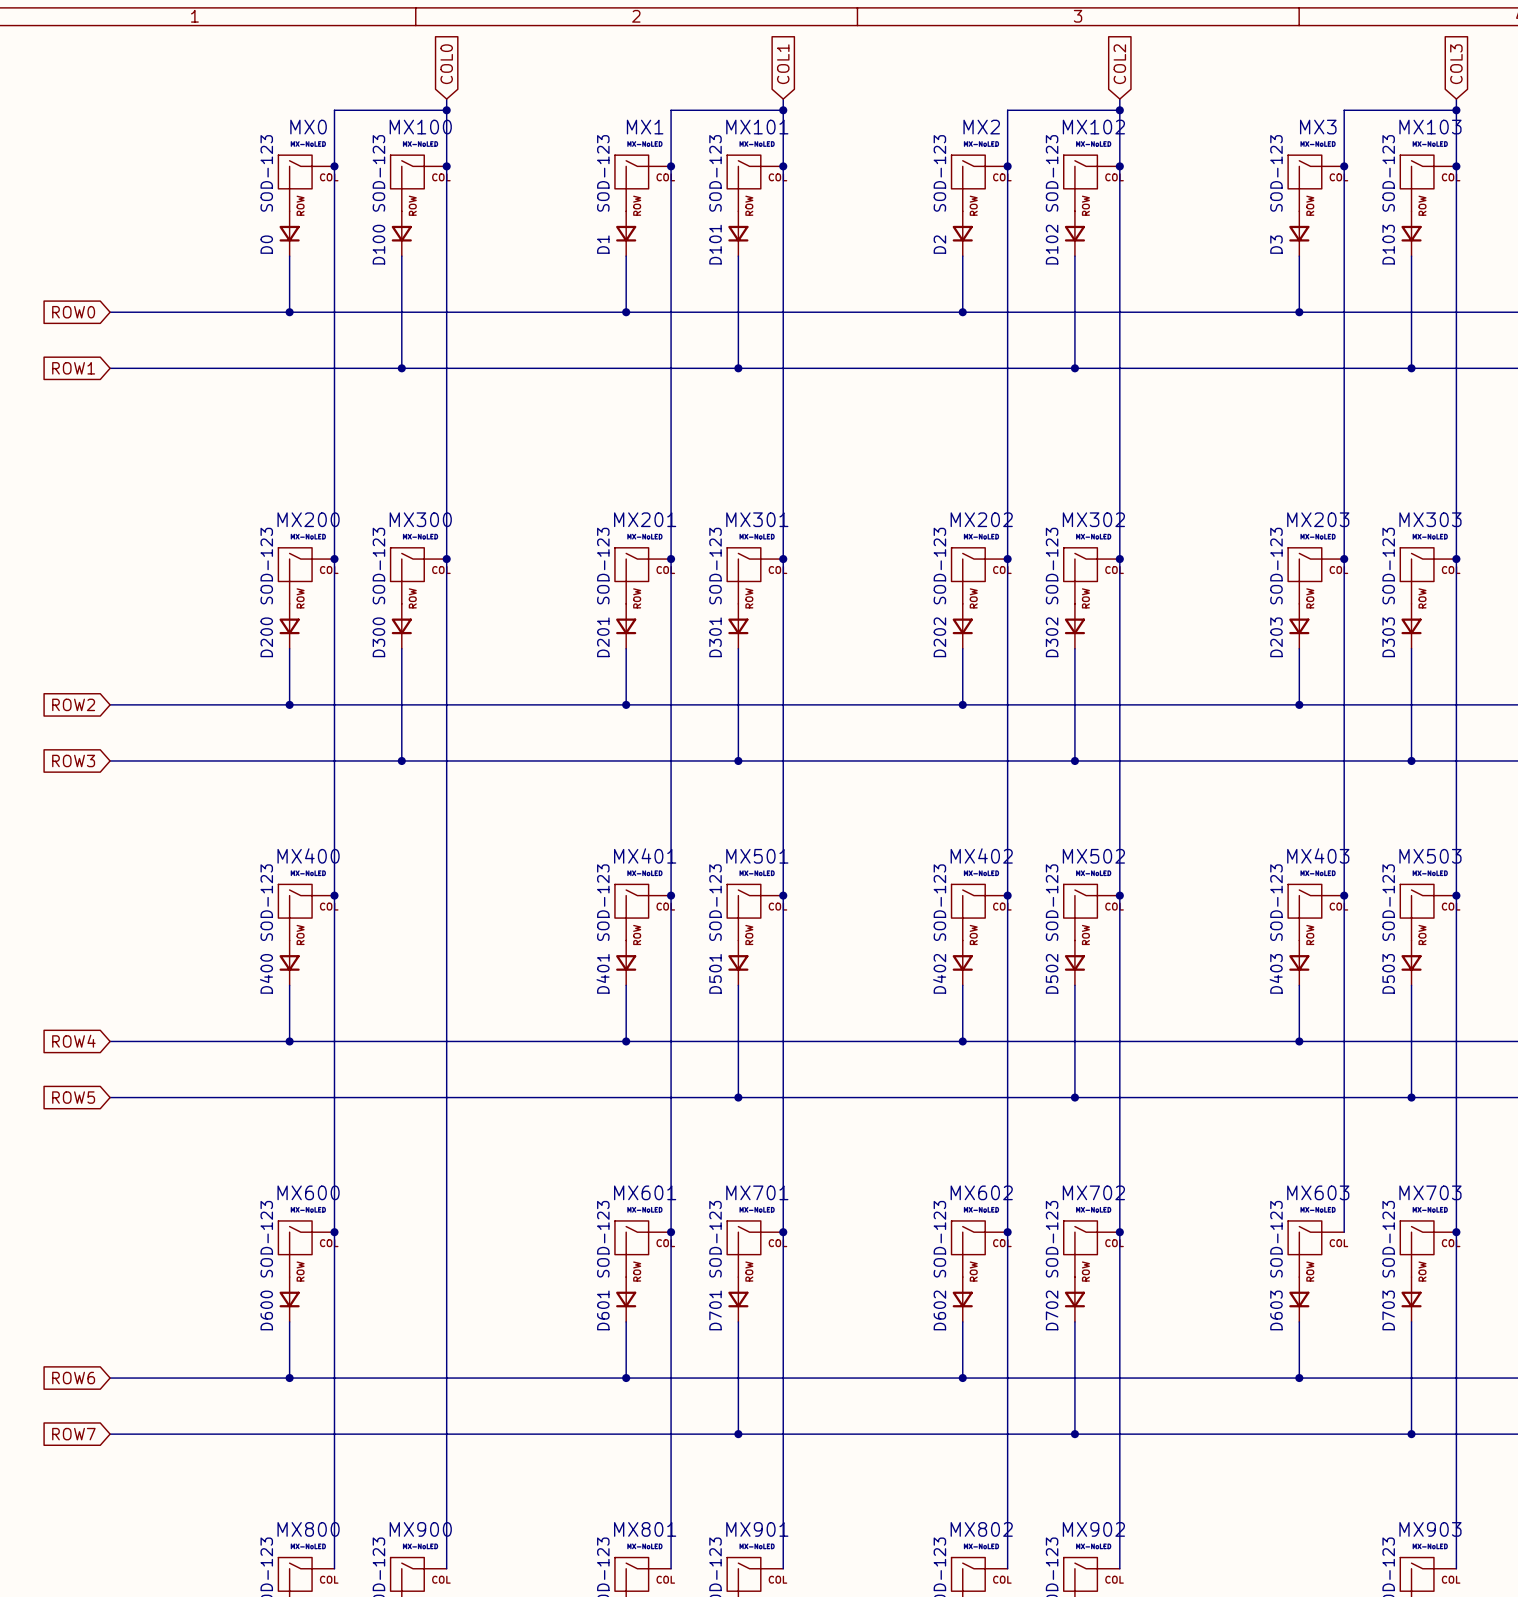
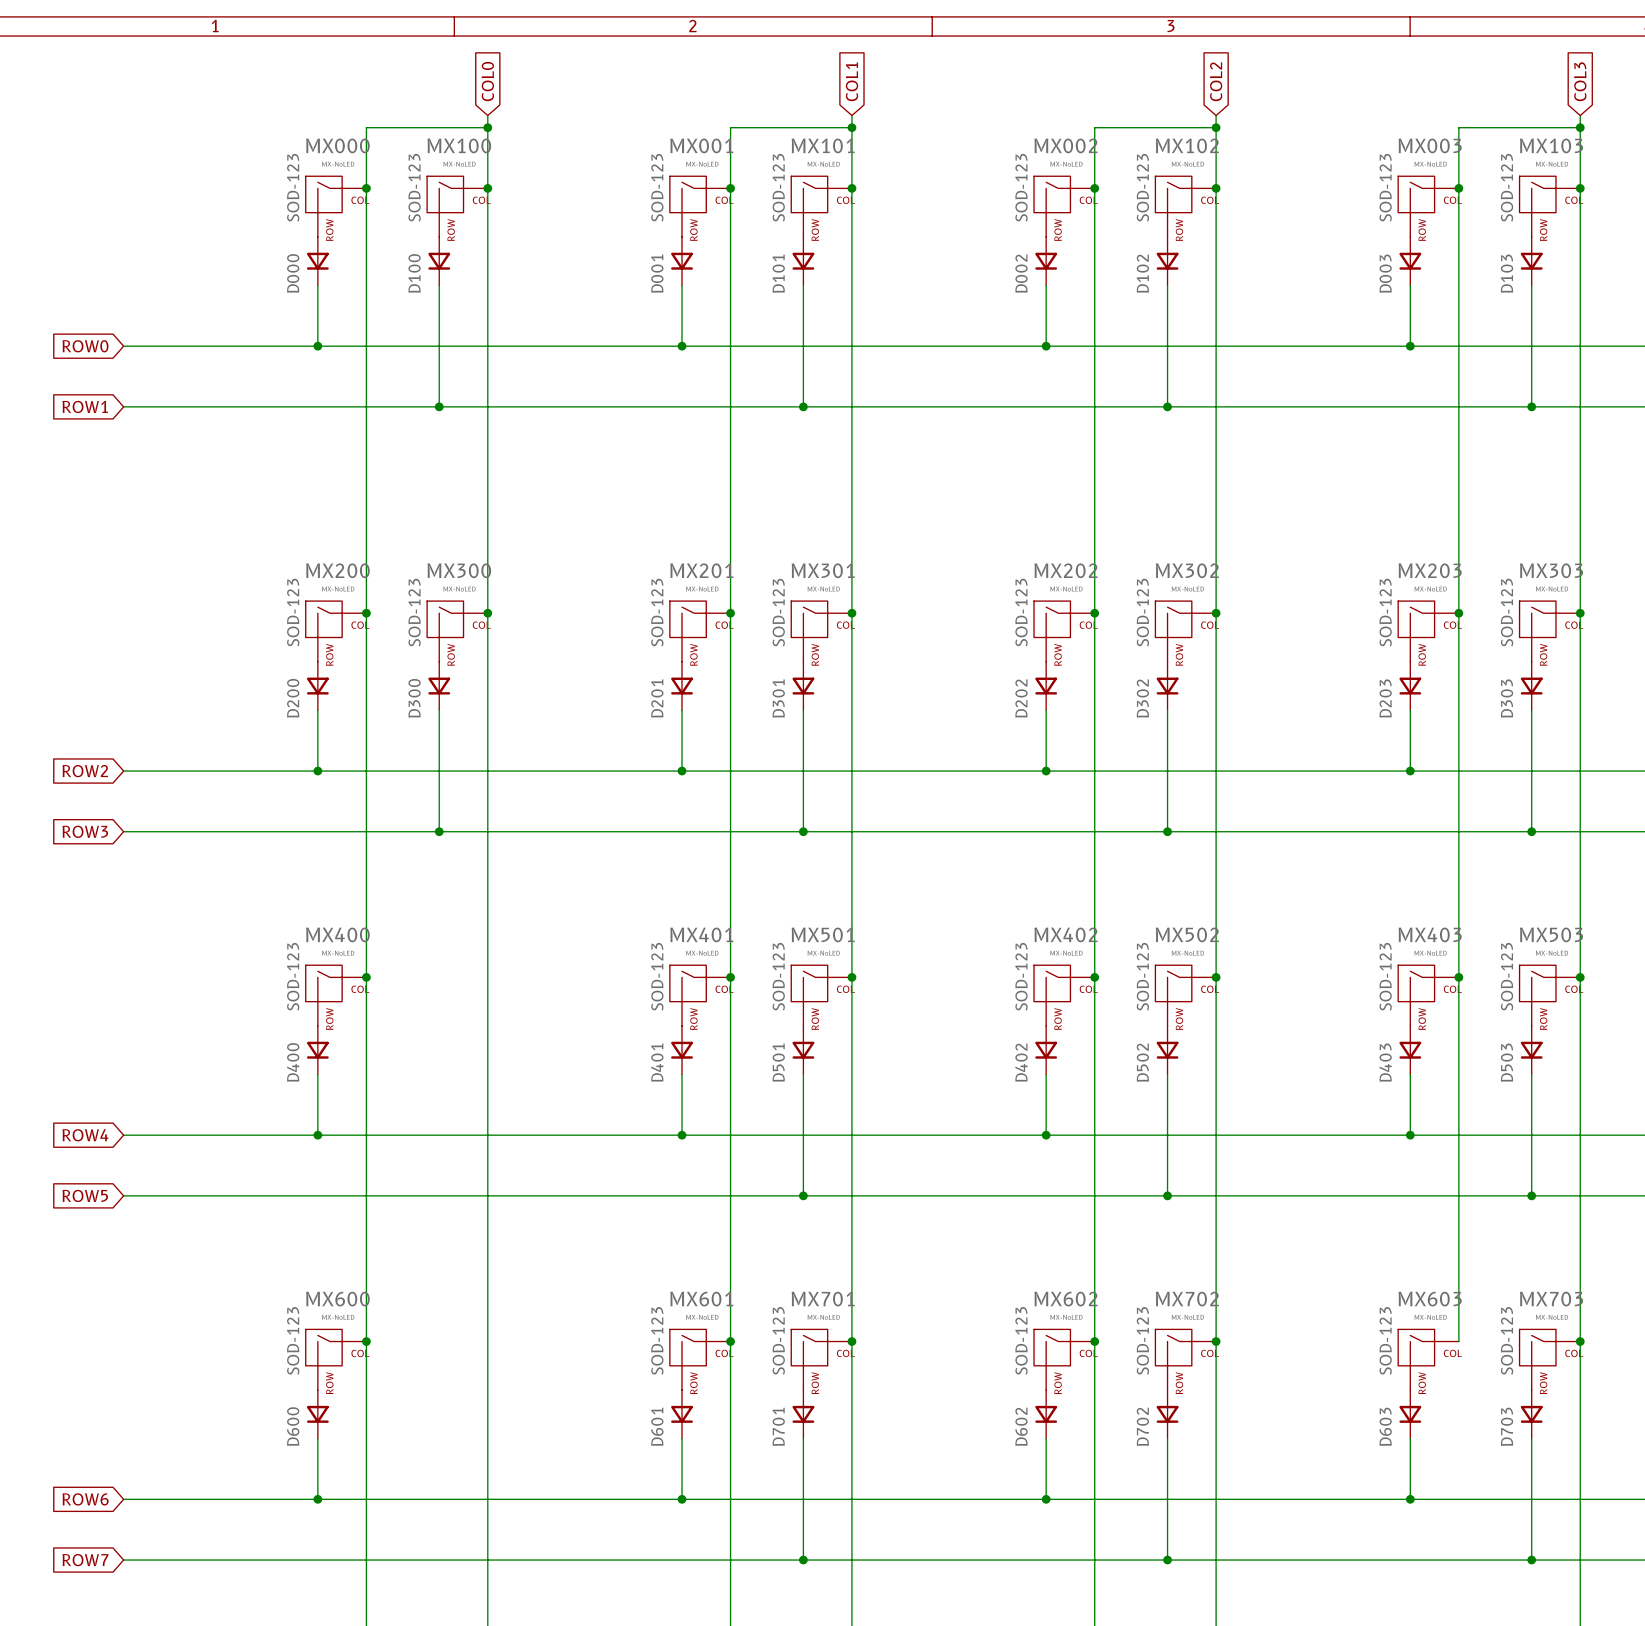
MX0 name: MX0 (308, 127) -> MX000 (337, 145)
MX1 name: MX1 (645, 127) -> MX001 (701, 145)
MX2 name: MX2 (981, 127) -> MX002 (1065, 145)
MX3 name: MX3 (1318, 127) -> MX003 (1430, 145)
D0 name: D0 (266, 244) -> D000 (293, 273)
D1 name: D1 (603, 244) -> D001 (657, 273)
D2 name: D2 (939, 244) -> D002 (1021, 273)
D3 name: D3 (1276, 244) -> D003 (1385, 273)

